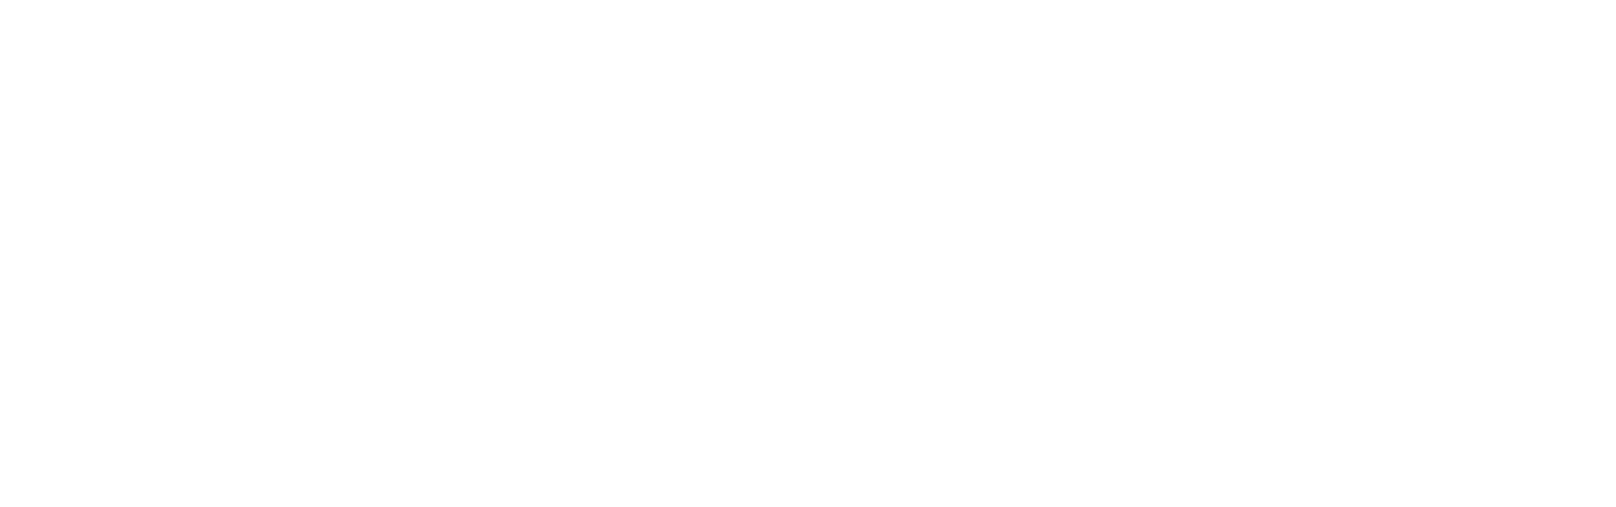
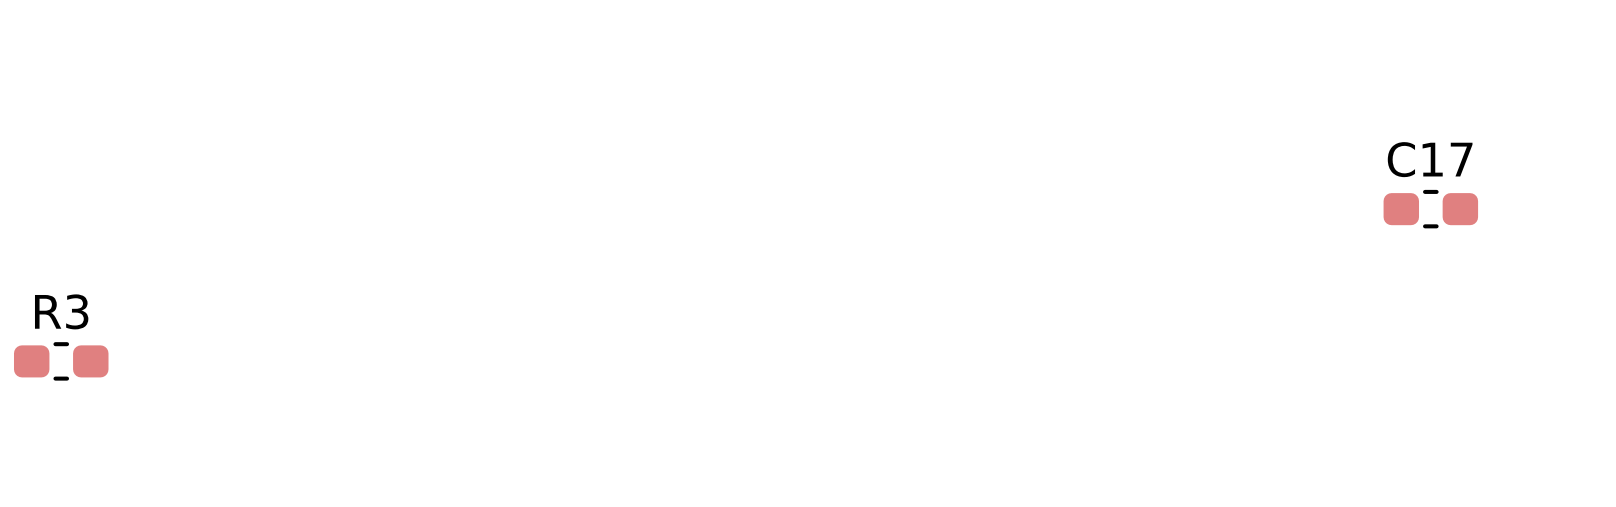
C17: none -> (1430, 209)
R3: none -> (61, 361)

